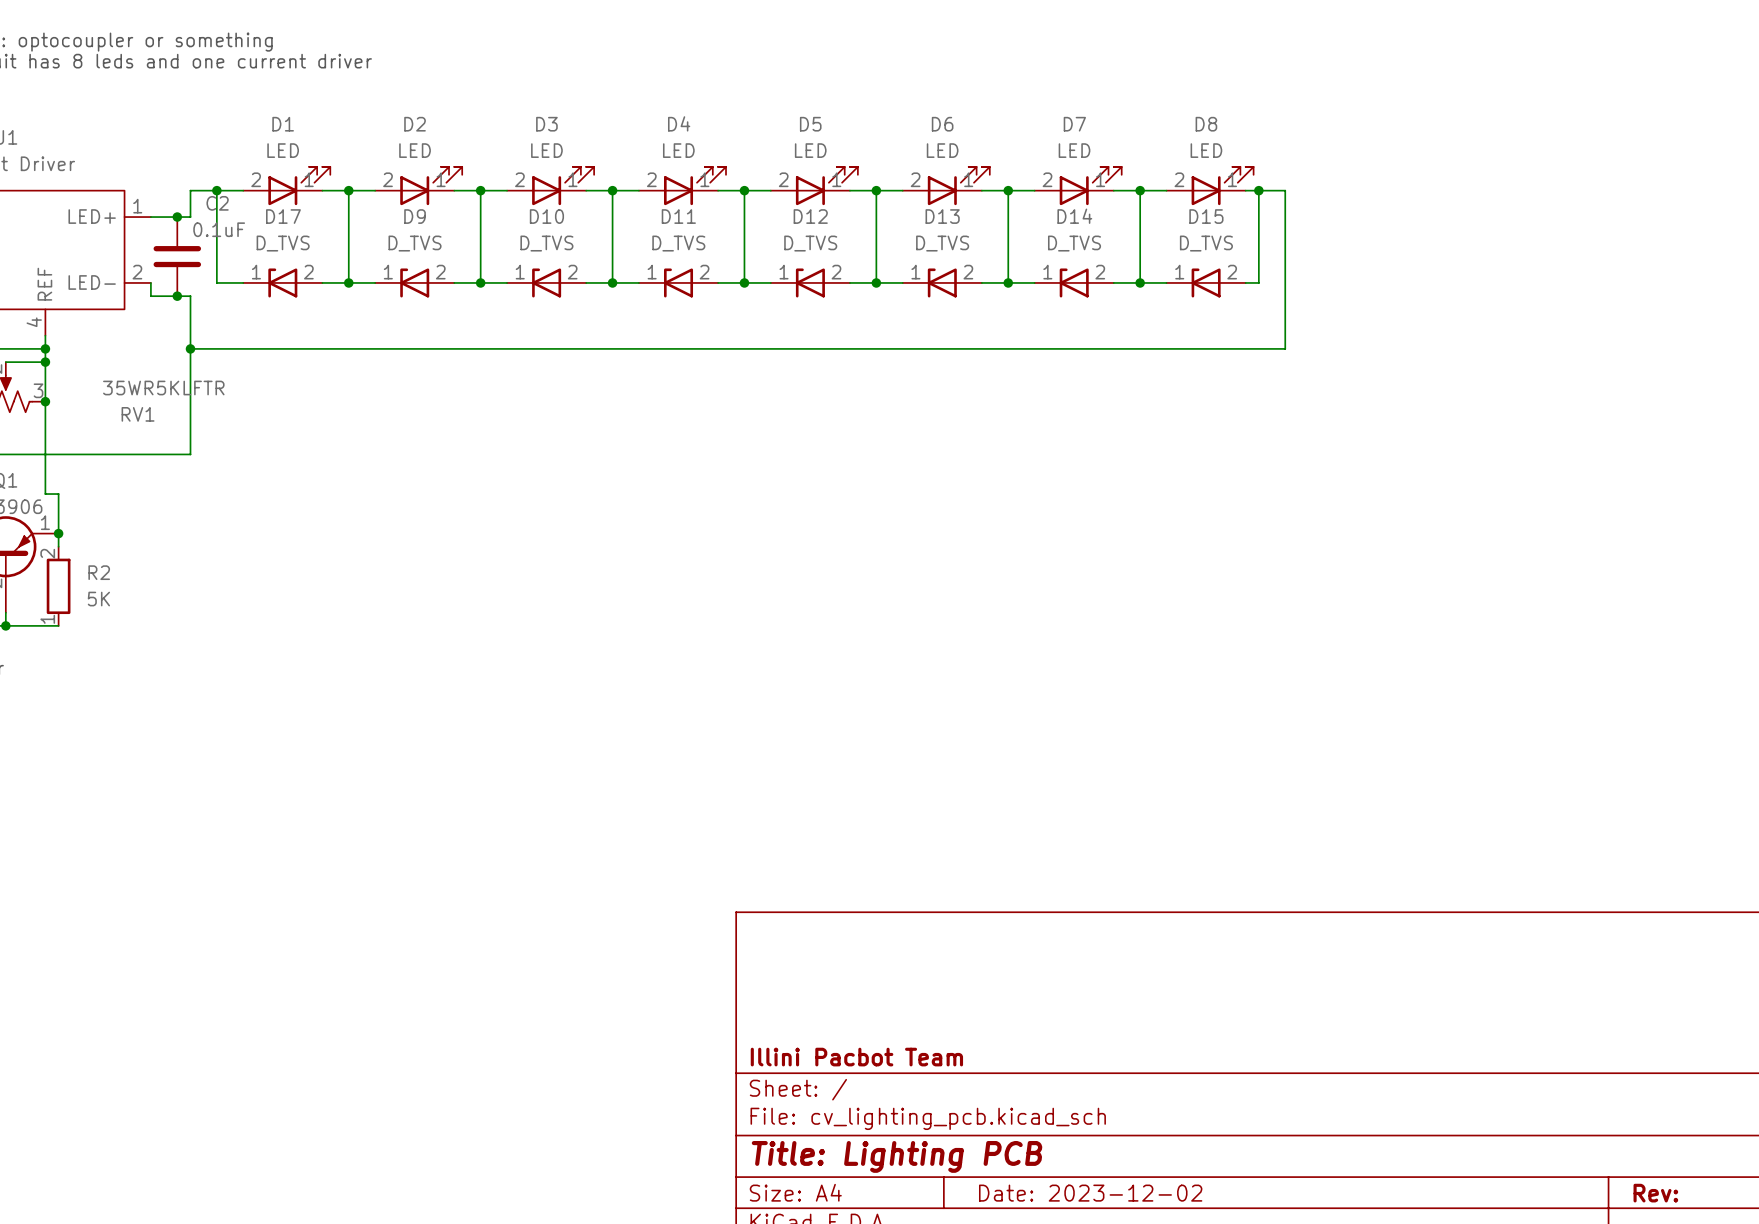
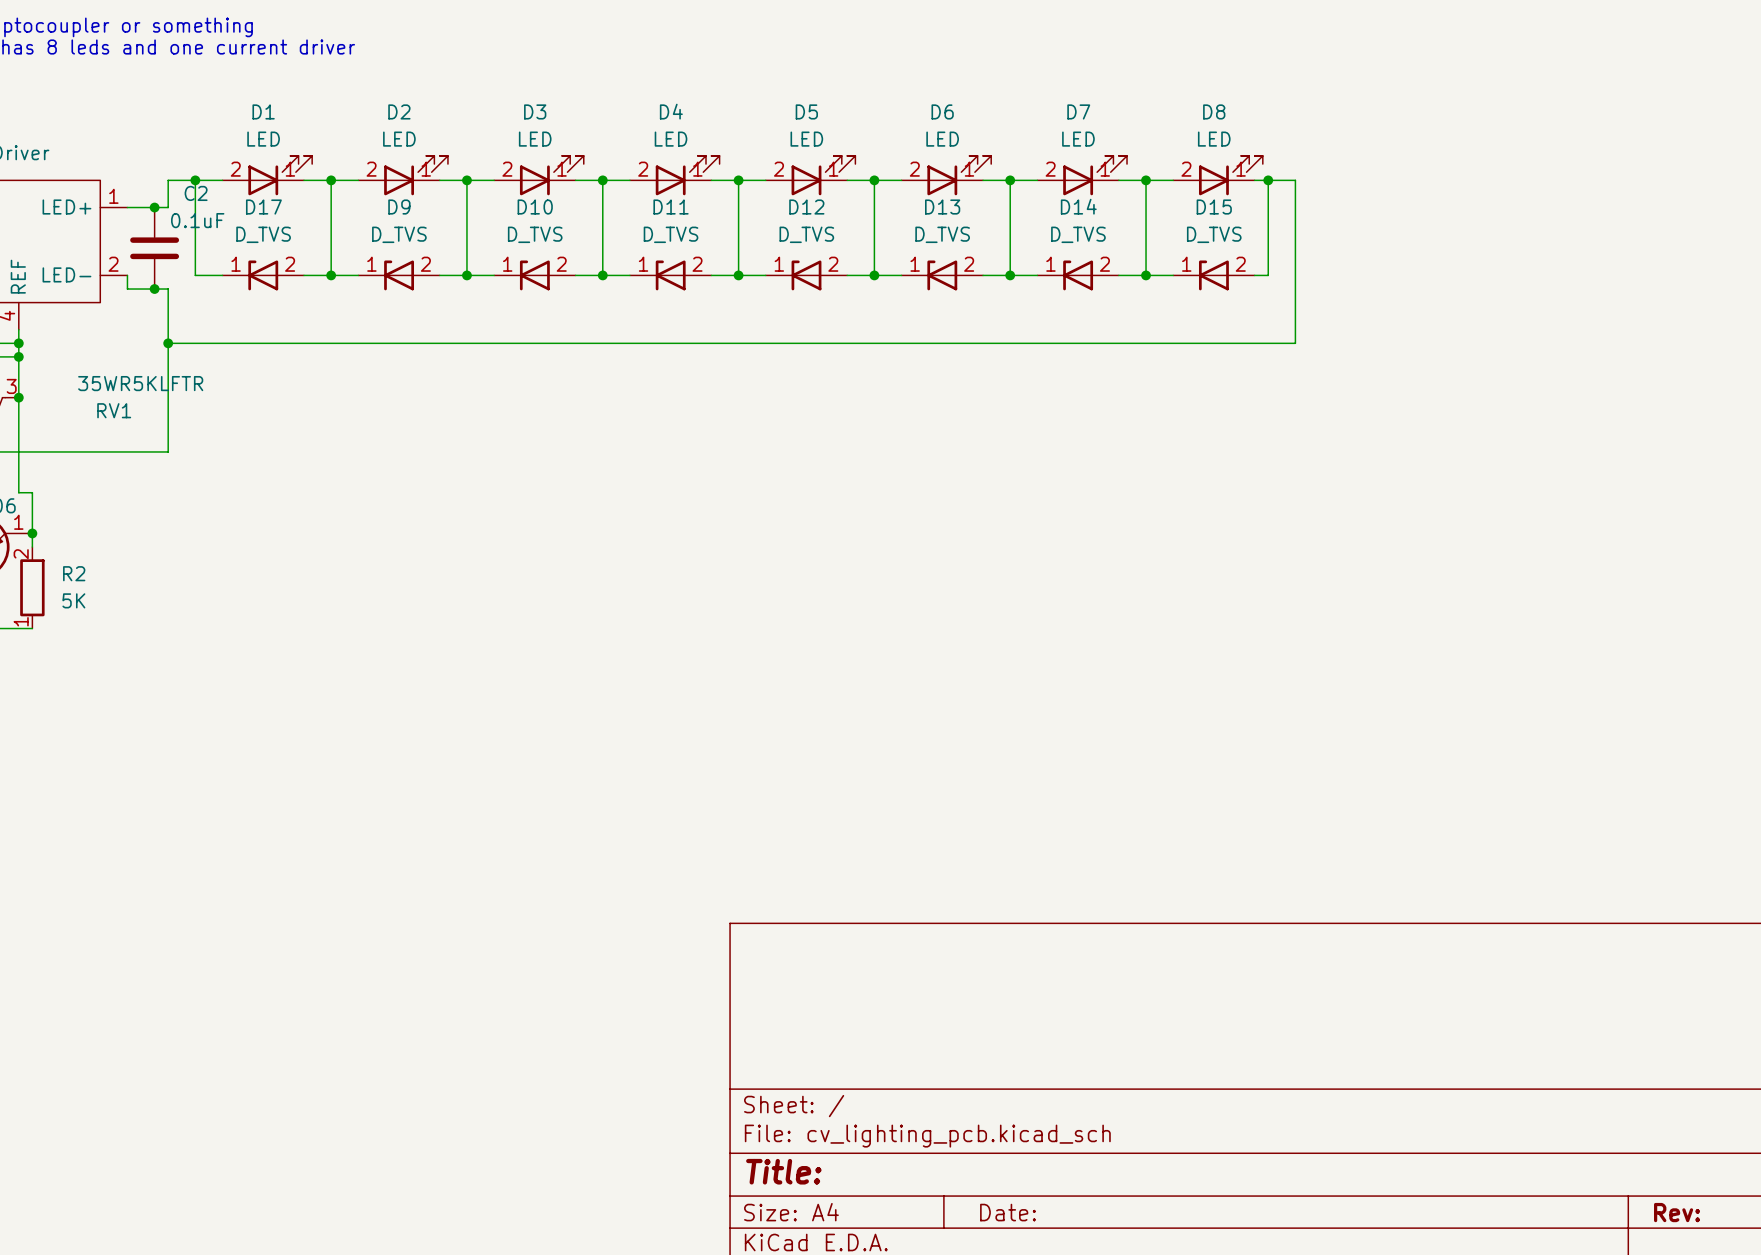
title block: Illini Pacbot Team (856, 1057) -> none
title block: Title: Lighting PCB (897, 1156) -> Title: (783, 1171)
title block: Date: 2023-12-02 (1090, 1193) -> Date: (1008, 1212)

